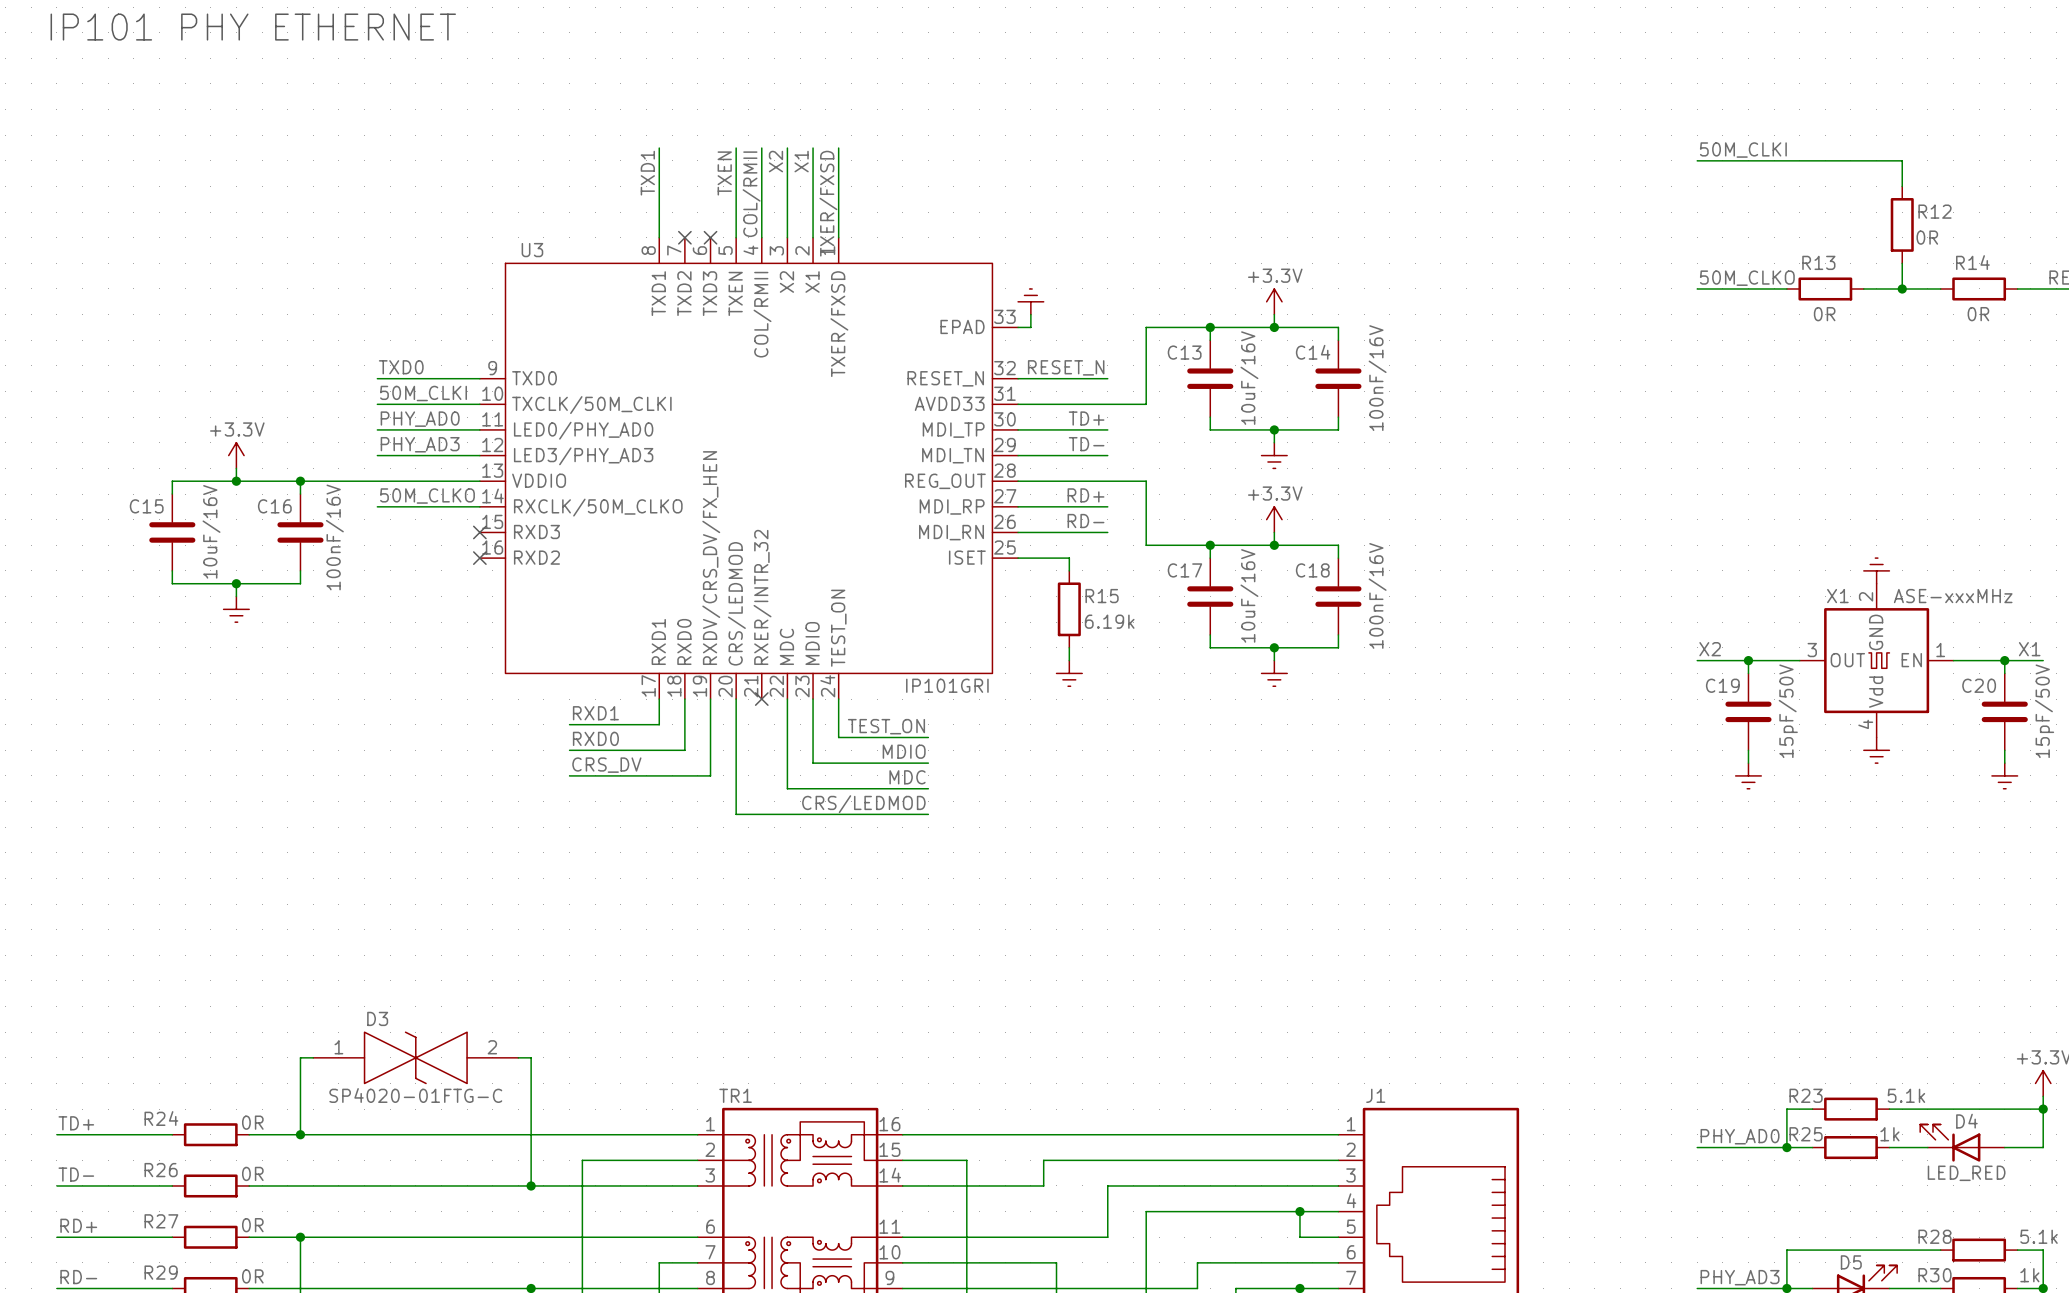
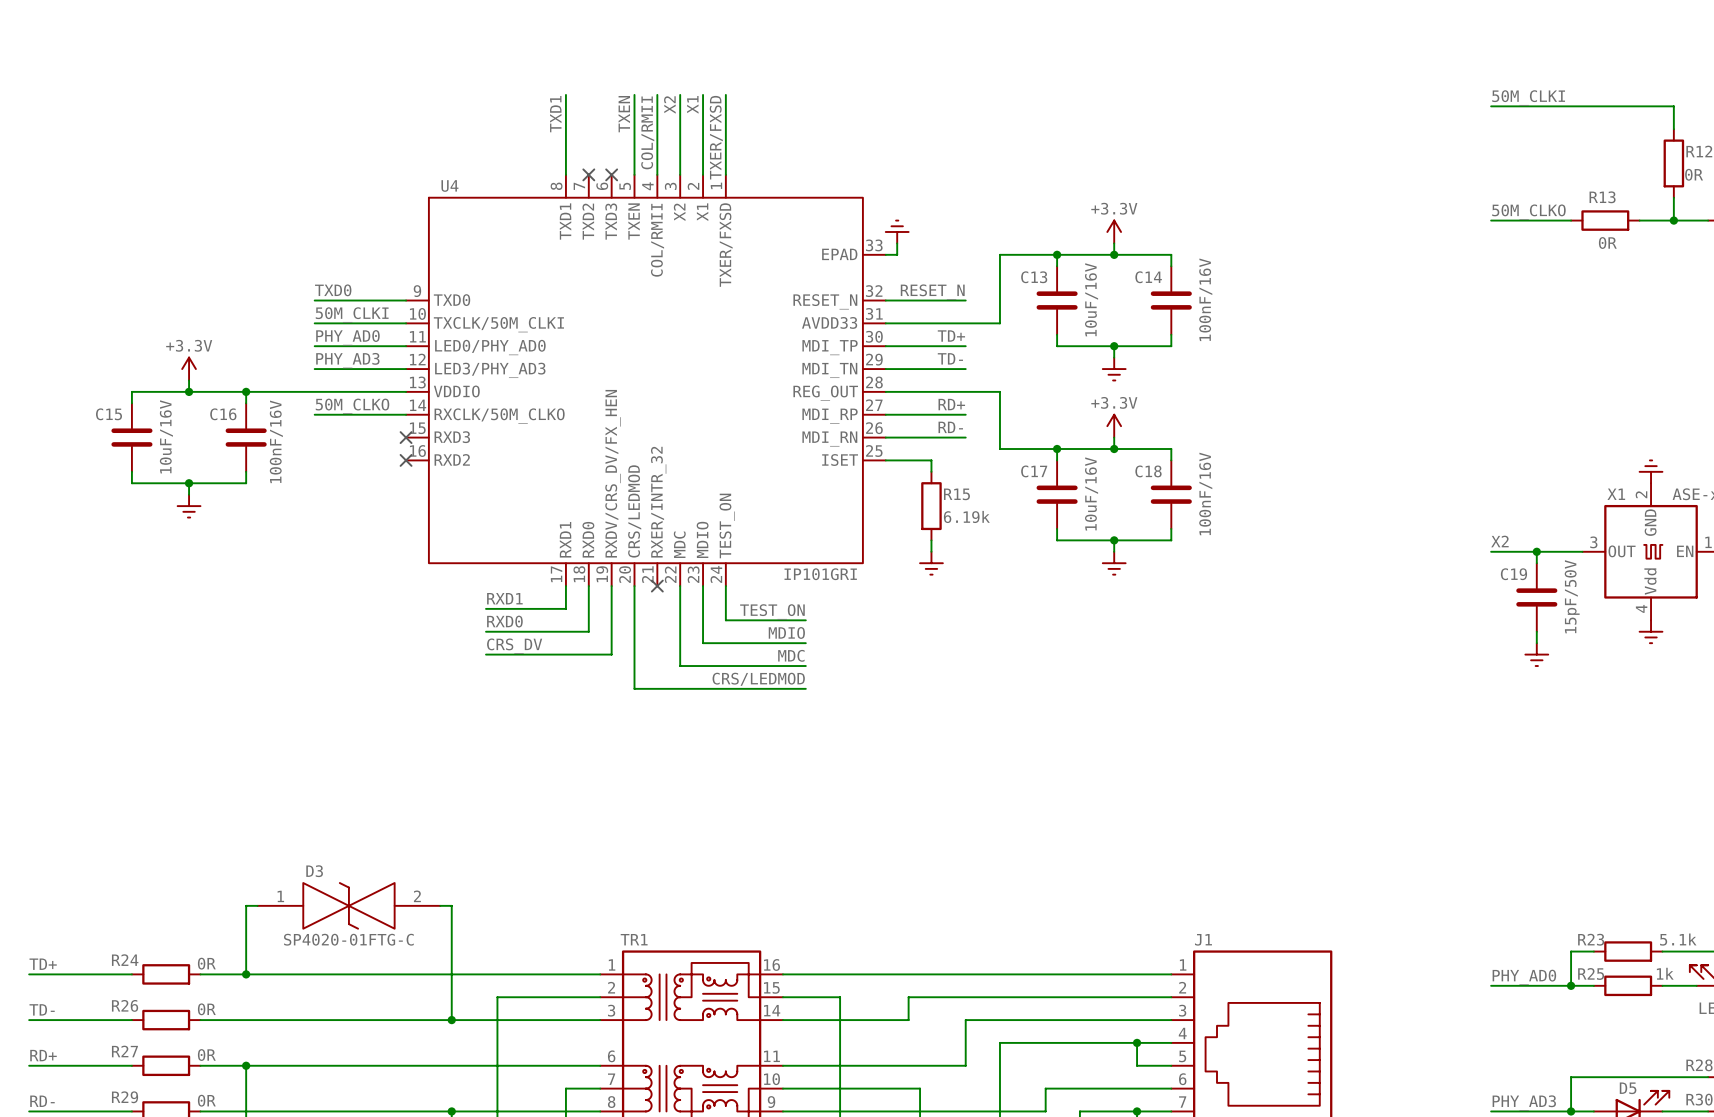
U3 name: U3 (532, 250) -> U4 (449, 185)

